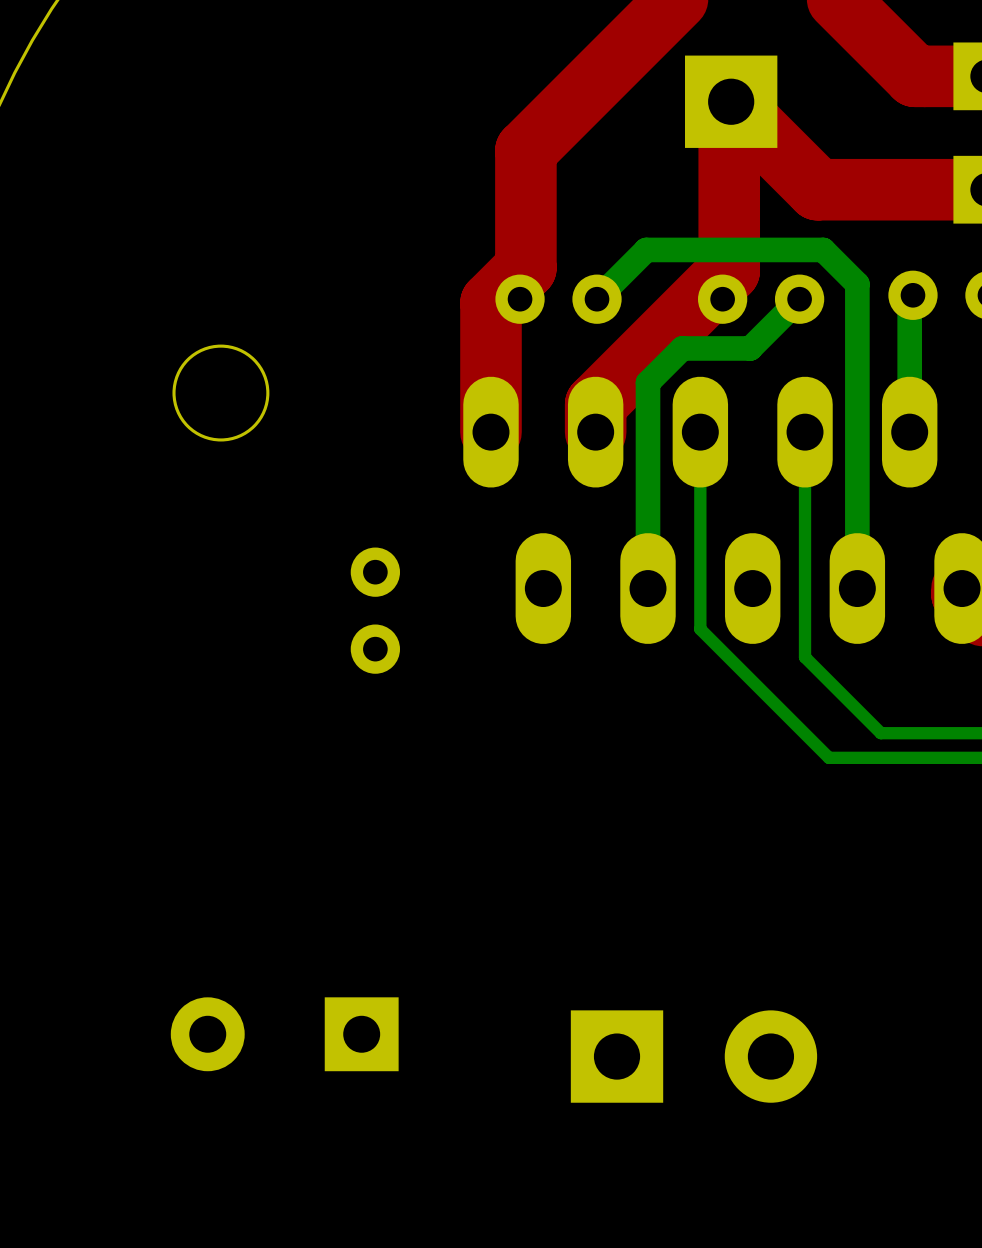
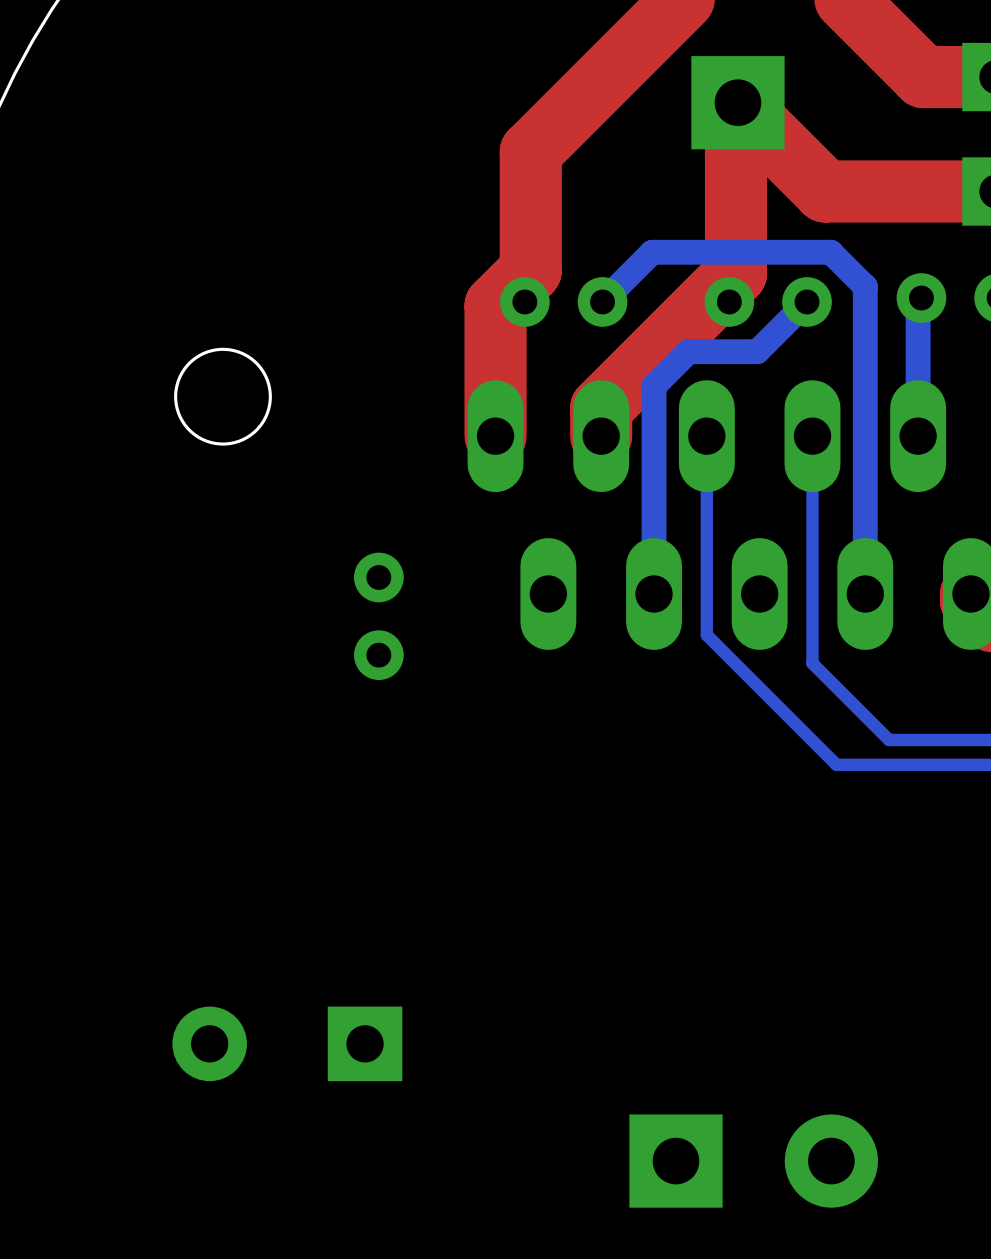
part position: (693, 1056) -> (753, 1161)

